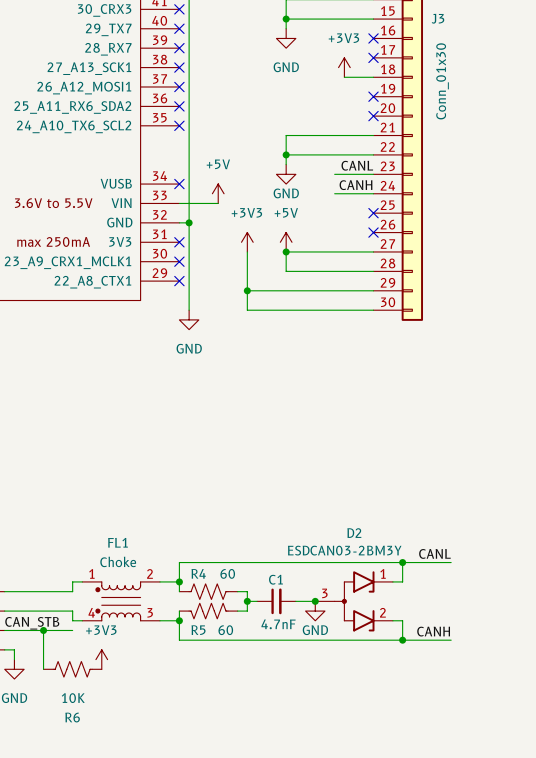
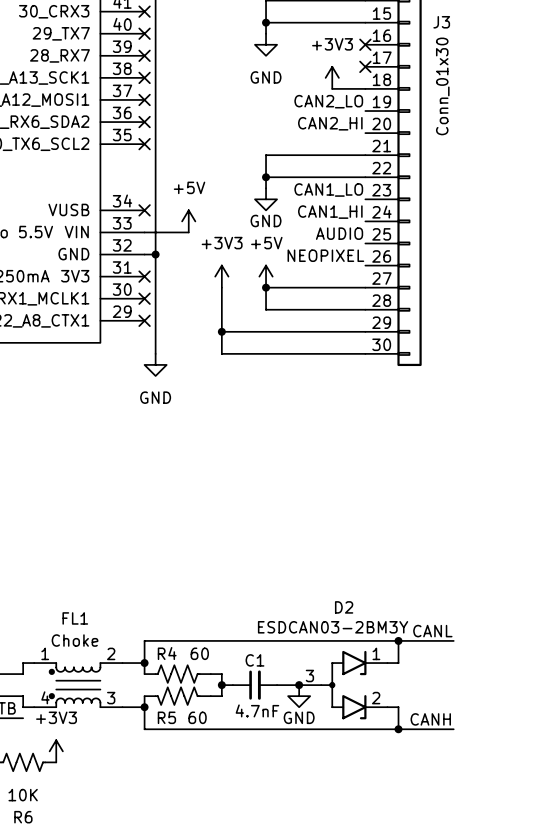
label: none -> CAN2_LO (328, 101)
no-connect mark: (373, 96) -> none
label: none -> CAN2_HI (330, 123)
no-connect mark: (373, 116) -> none
label: CANL (357, 165) -> CAN1_LO (328, 190)
wire: (334, 174) (373, 174) -> none
label: CANH (355, 185) -> CAN1_HI (330, 212)
wire: (334, 193) (373, 193) -> none
label: none -> AUDIO (339, 233)
no-connect mark: (373, 213) -> none
label: none -> NEOPIXEL (325, 255)
no-connect mark: (373, 232) -> none

